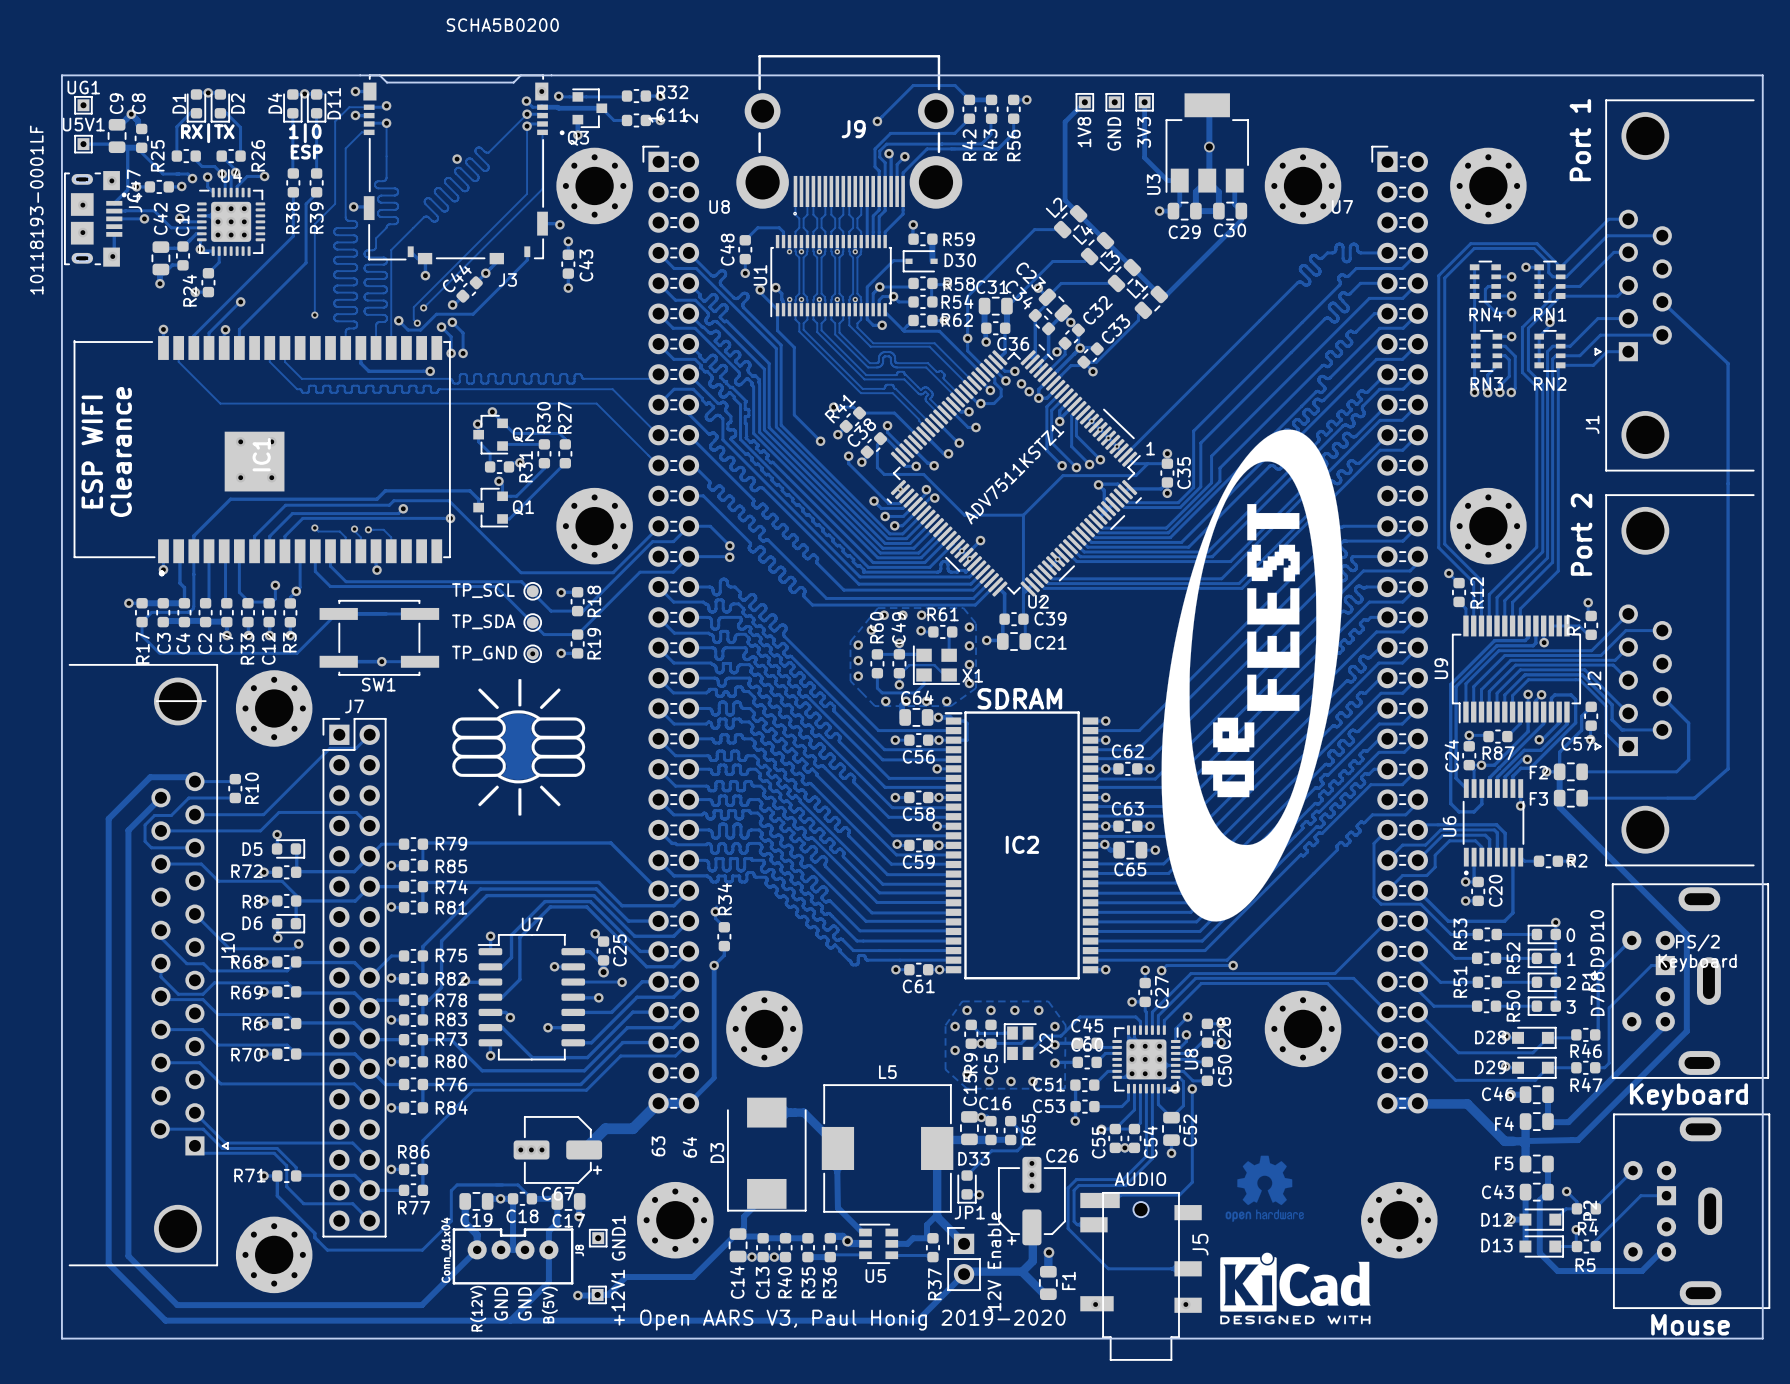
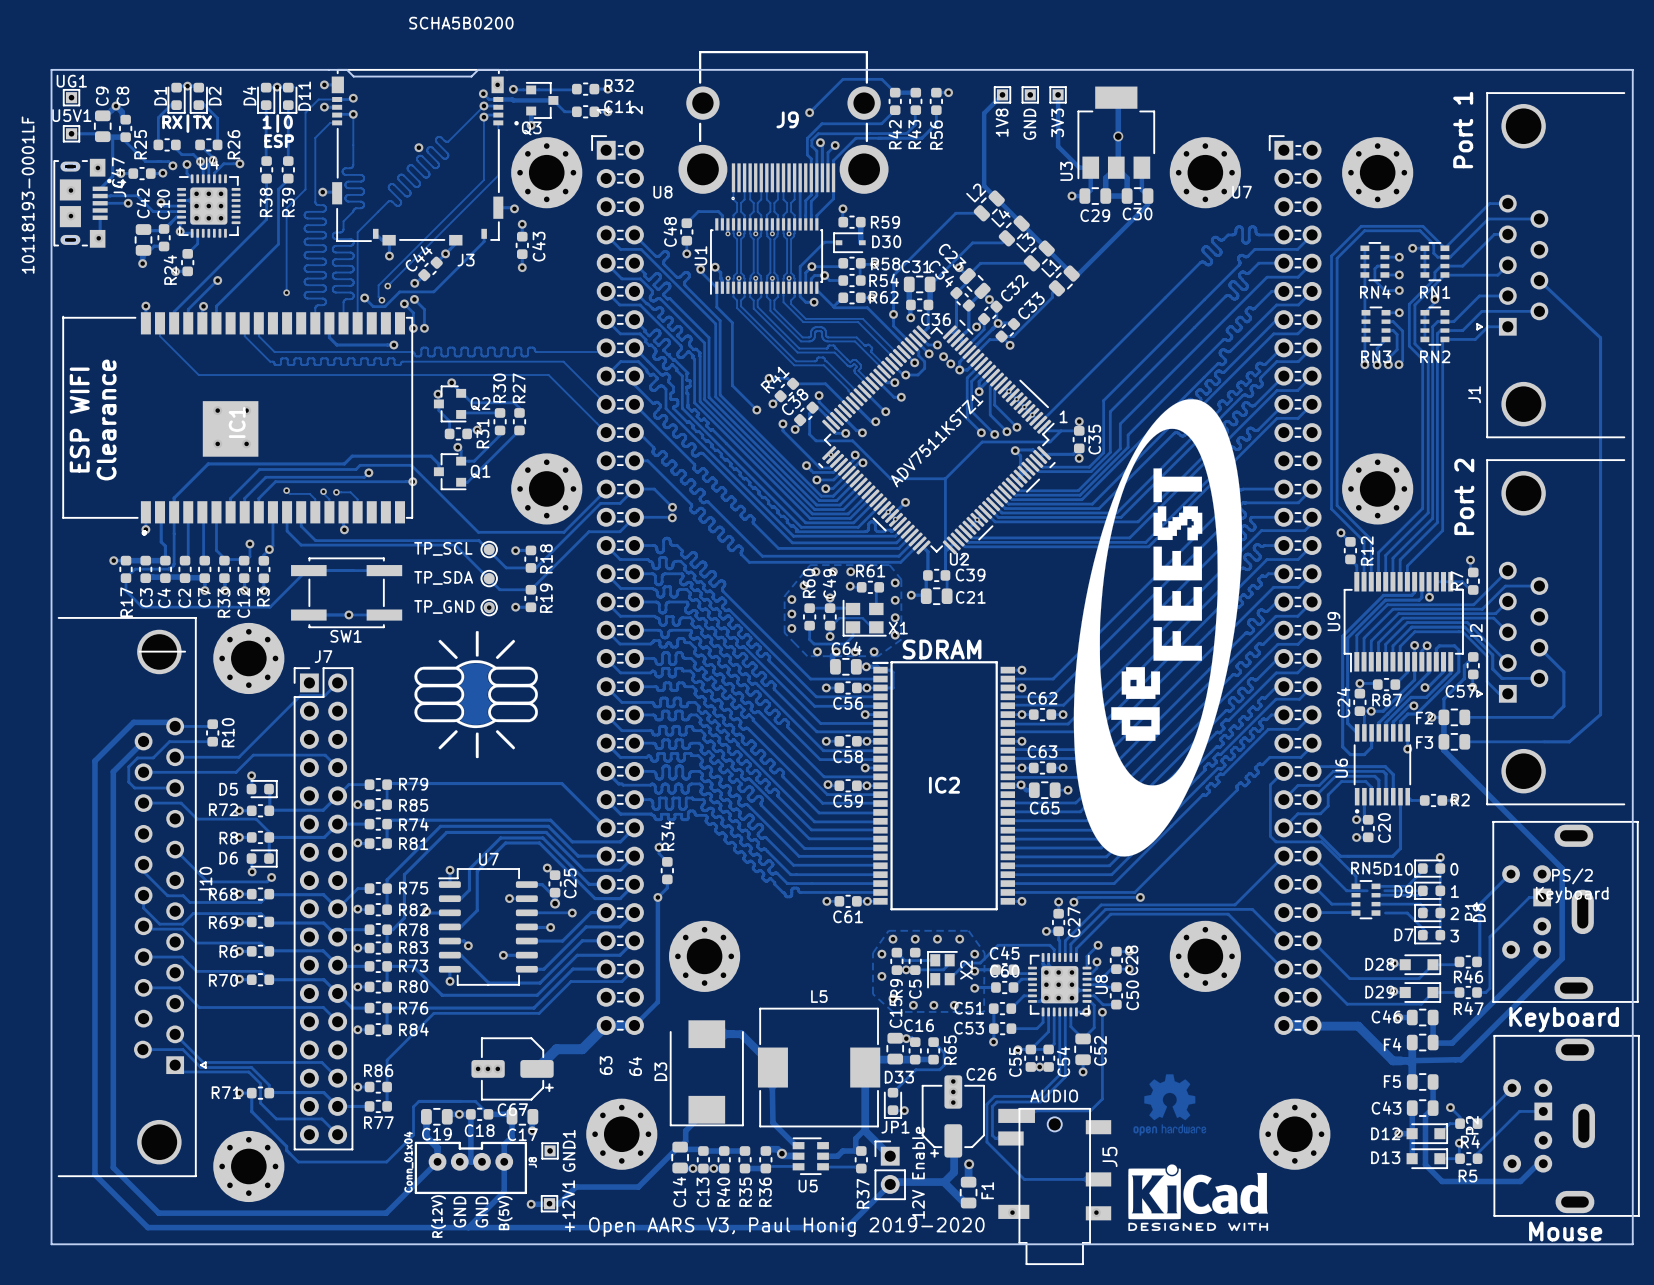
track: (1374, 843) (1374, 897) (1380, 904) (1420, 904) (1451, 934) (1477, 934) -> (1271, 783) (1270, 836) (1275, 841) (1321, 841) (1355, 876) (1355, 886)
D10 name rotation: 0° (1597, 925) -> 90° clockwise (1398, 869)
D10 name position: D10 (1597, 925) -> D10 (1398, 869)
track: none -> (1427, 866) (1407, 886) (1375, 886)
R53: (1487, 934) -> none
track: (1496, 934) (1536, 934) -> none
track: none -> (1312, 884) (1331, 904) (1355, 904)
track: none -> (1427, 888) (1420, 895) (1375, 895)
D9 name rotation: 0° (1597, 956) -> 90° clockwise (1403, 891)
D9 name position: D9 (1597, 956) -> D9 (1403, 891)
R52: (1486, 958) -> none
track: (1417, 959) (1440, 982) (1477, 982) -> none
RN5: none -> (1365, 899)
track: none -> (1375, 904) (1420, 904) (1427, 910)
track: none -> (1312, 912) (1355, 913)
R51: (1487, 982) -> none
track: (1520, 982) (1536, 982) -> (1407, 913) (1427, 933)
track: (1417, 990) (1433, 1006) (1477, 1006) -> none
D7 name rotation: 0° (1597, 1005) -> 90° clockwise (1404, 934)
D7 name position: D7 (1597, 1005) -> D7 (1404, 934)
R50: (1486, 1006) -> none
track: (1495, 1006) (1536, 1006) -> none

